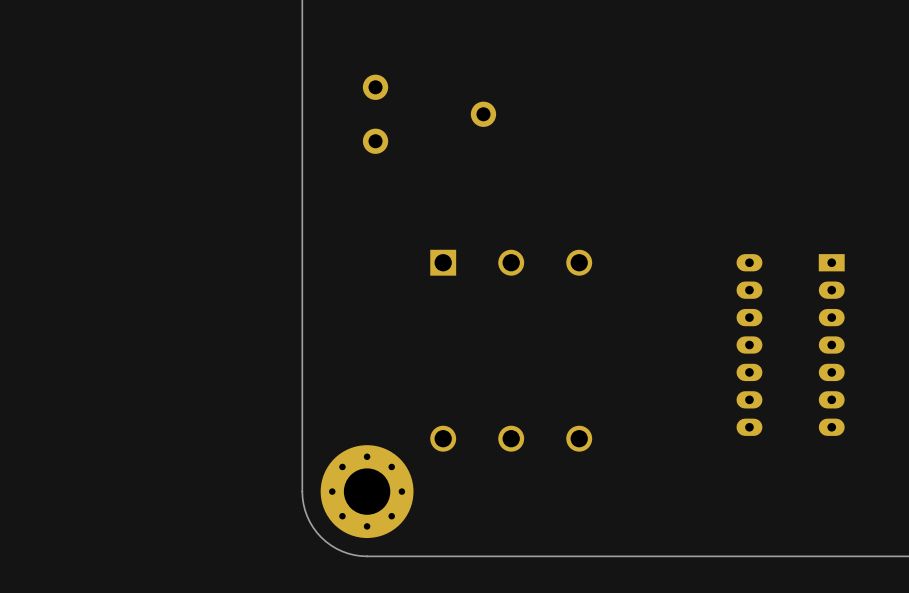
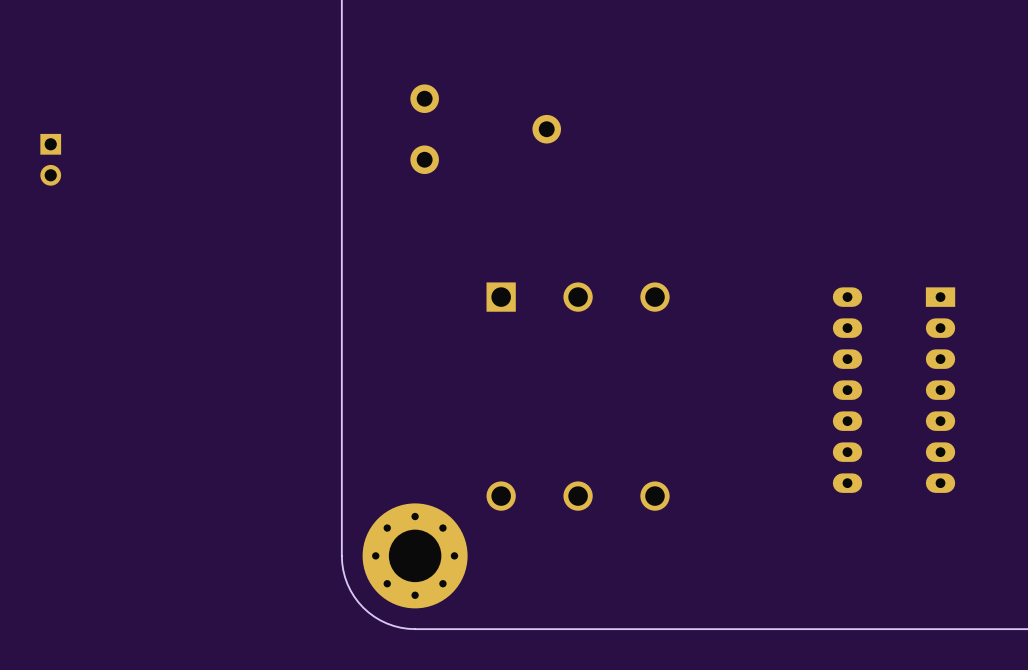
part: none -> (50, 159)

